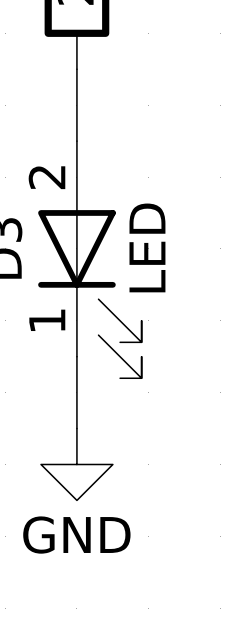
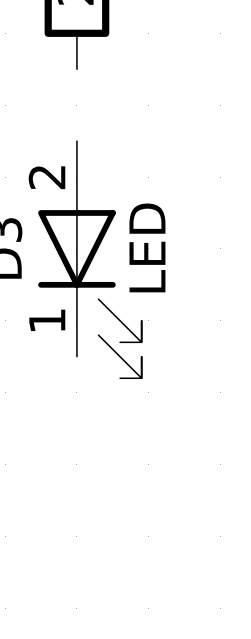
wire: (76, 69) (76, 141) -> none
wire: (76, 356) (76, 428) -> none
power symbol: GND (76, 464) -> none

